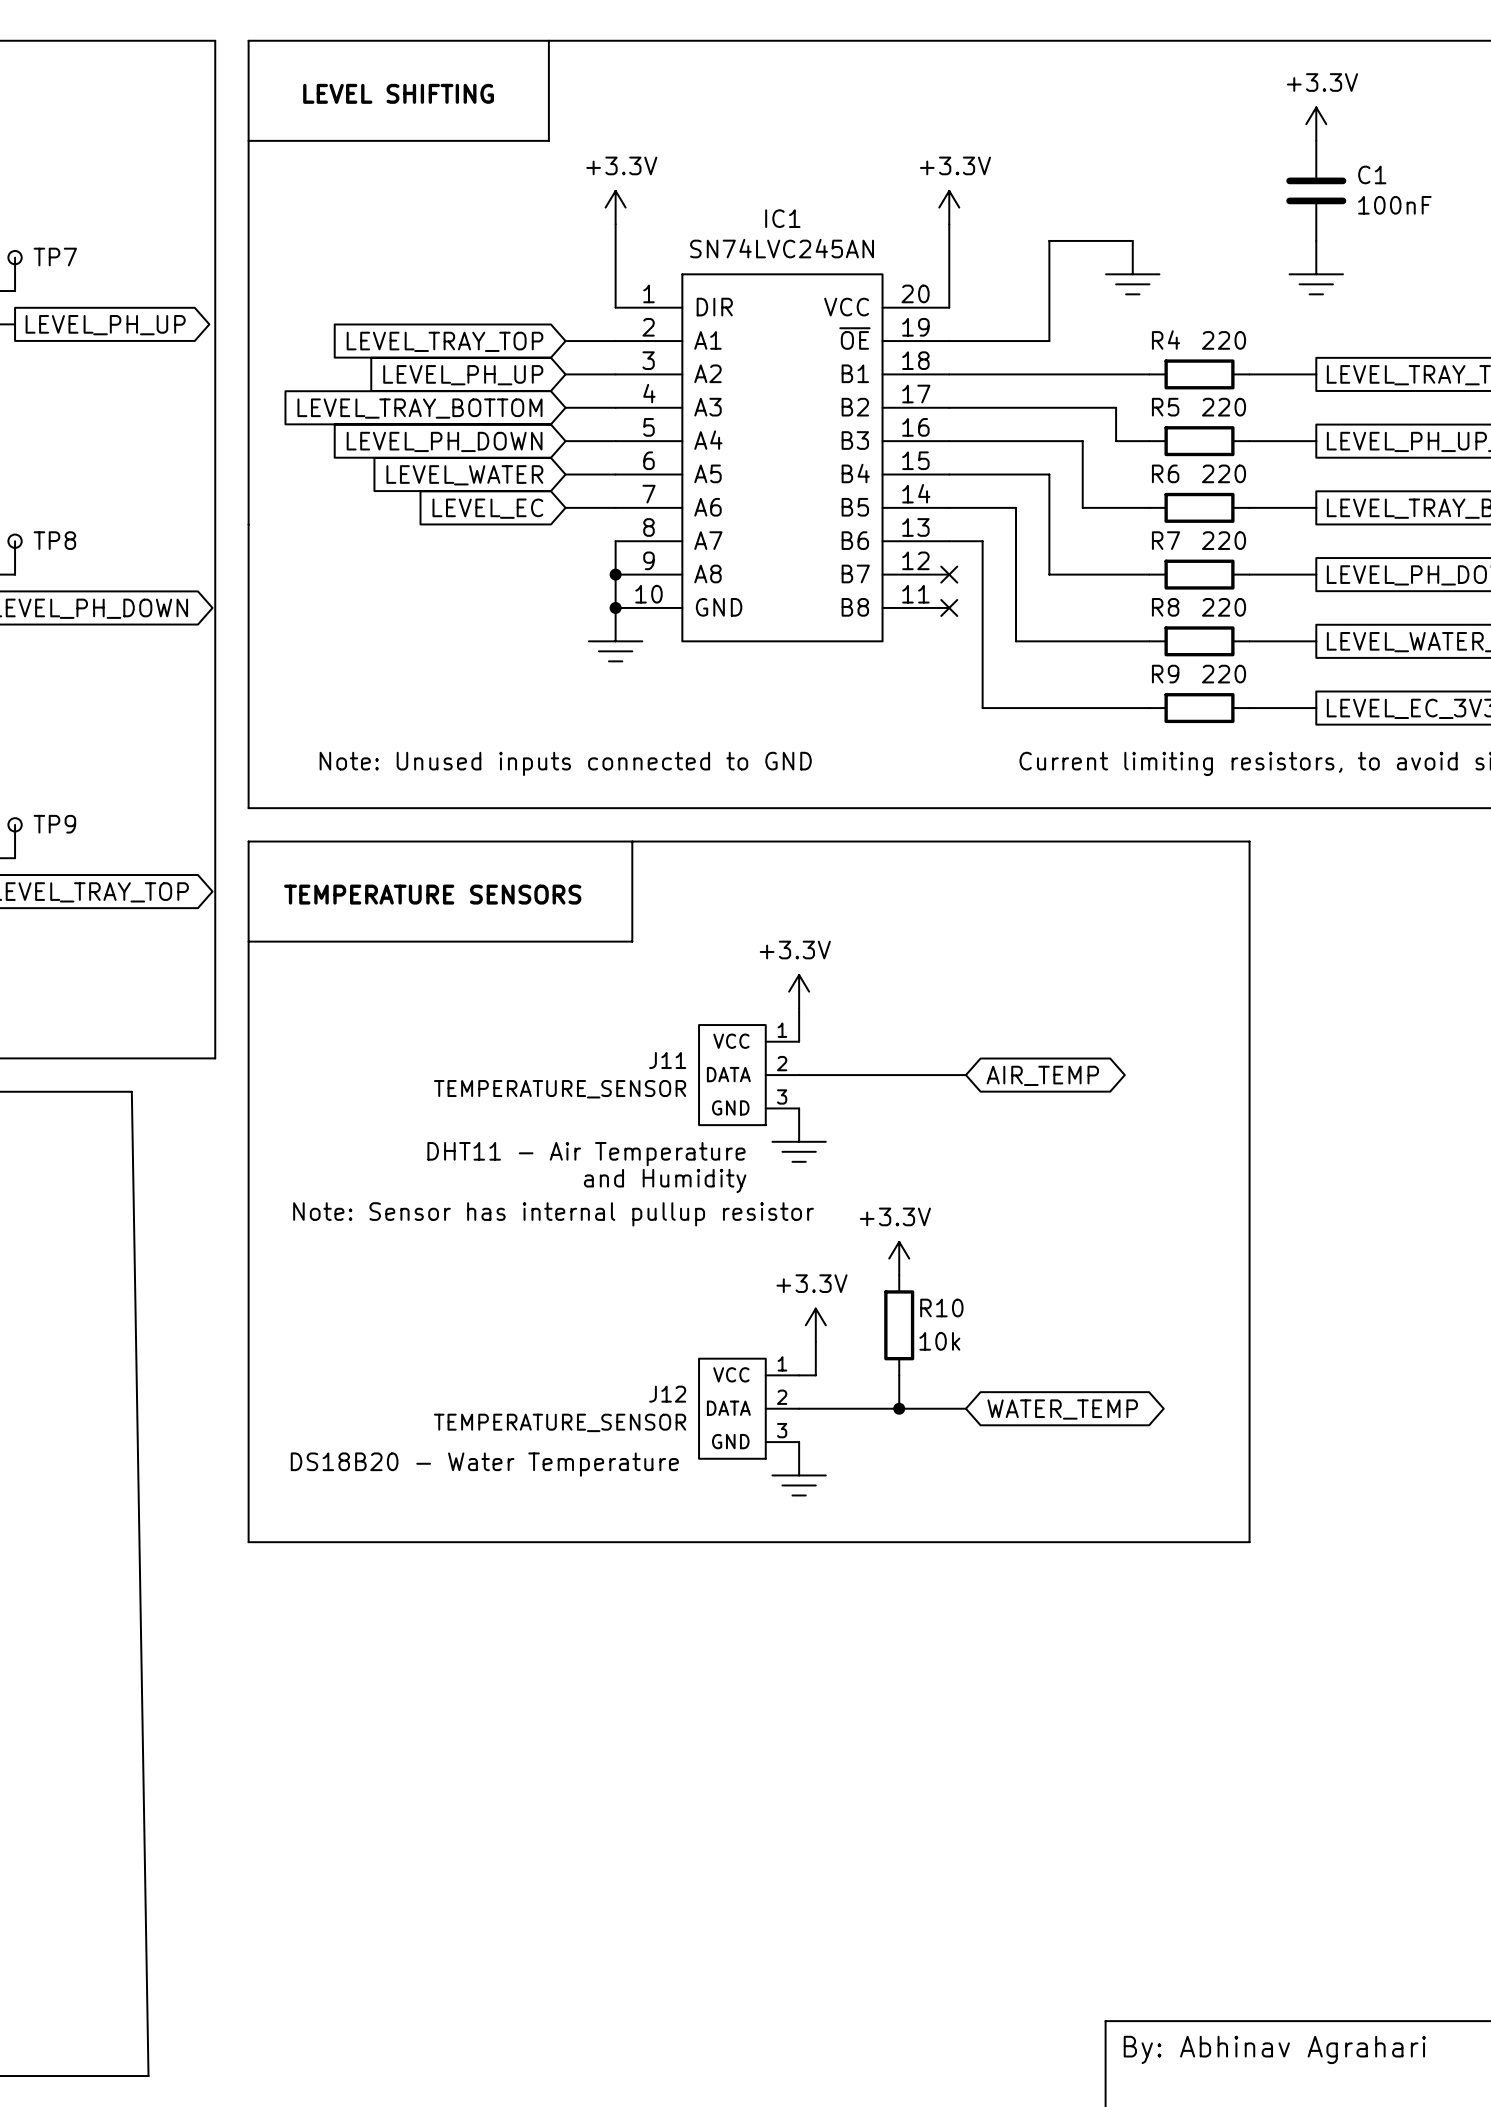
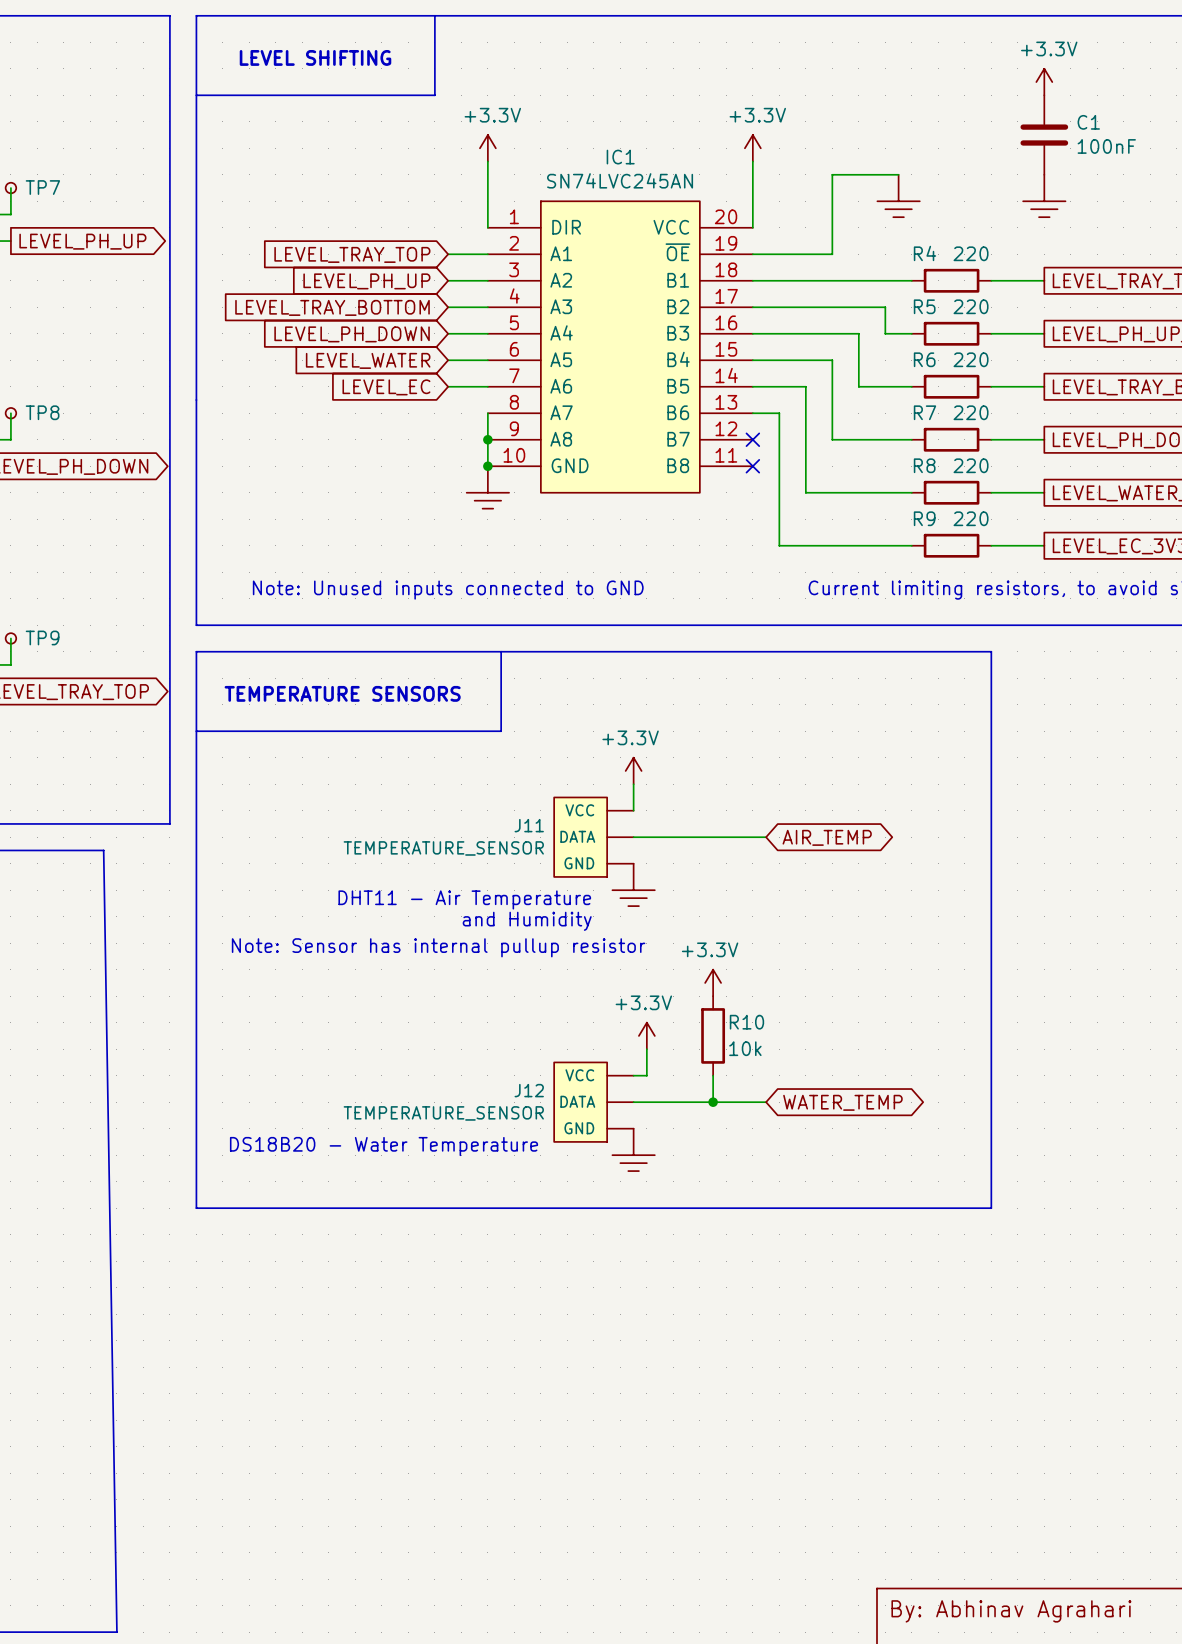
J11 pin number: 1 (782, 1030) -> none
J11 pin number: 2 (782, 1063) -> none
J11 pin number: 3 (782, 1096) -> none
J12 pin number: 1 (782, 1363) -> none
J12 pin number: 2 (782, 1397) -> none
J12 pin number: 3 (782, 1430) -> none

